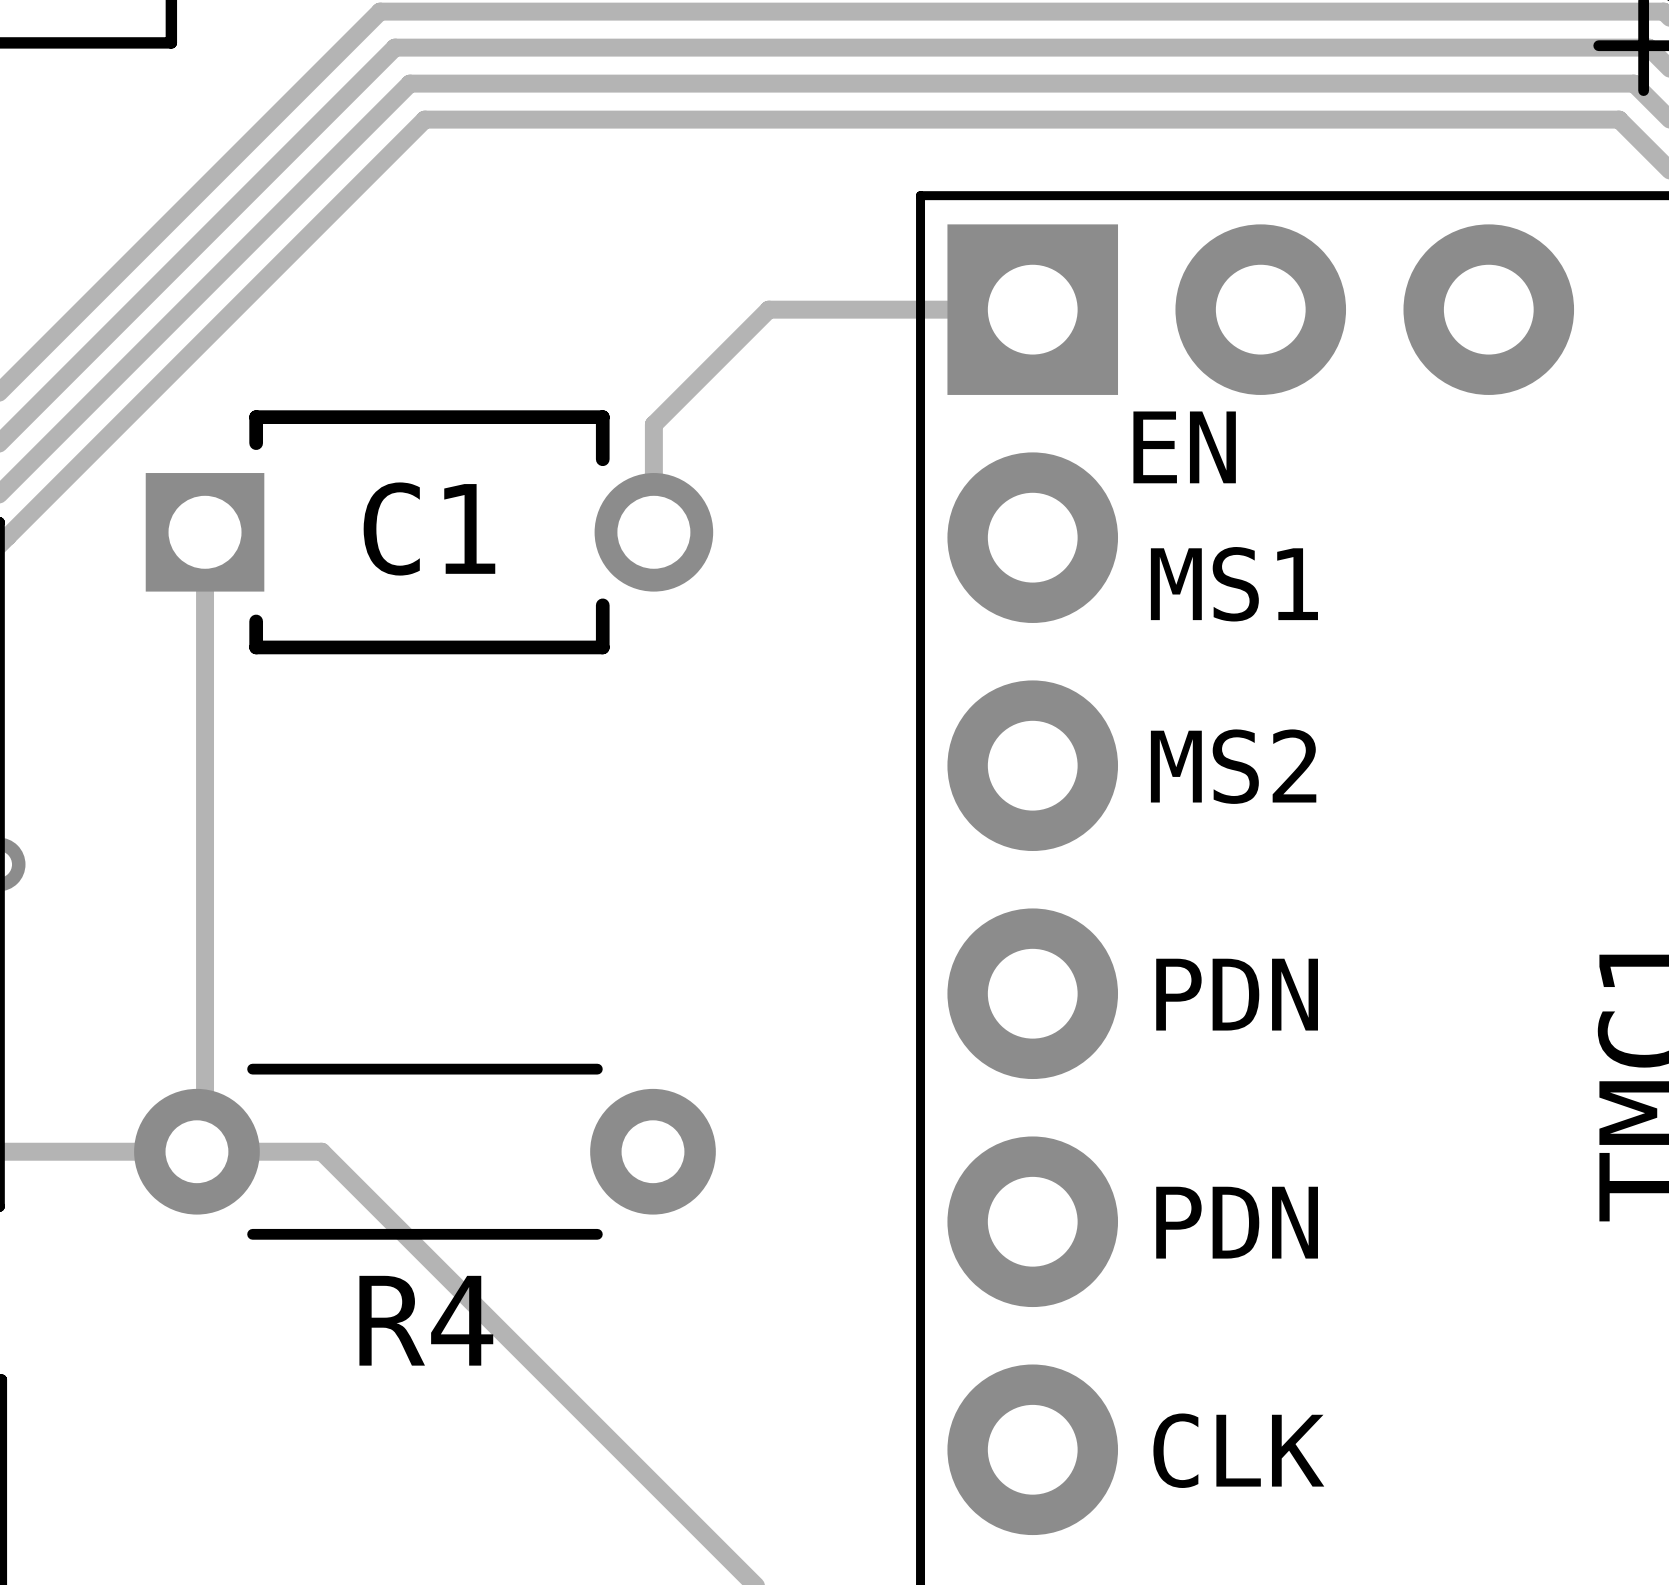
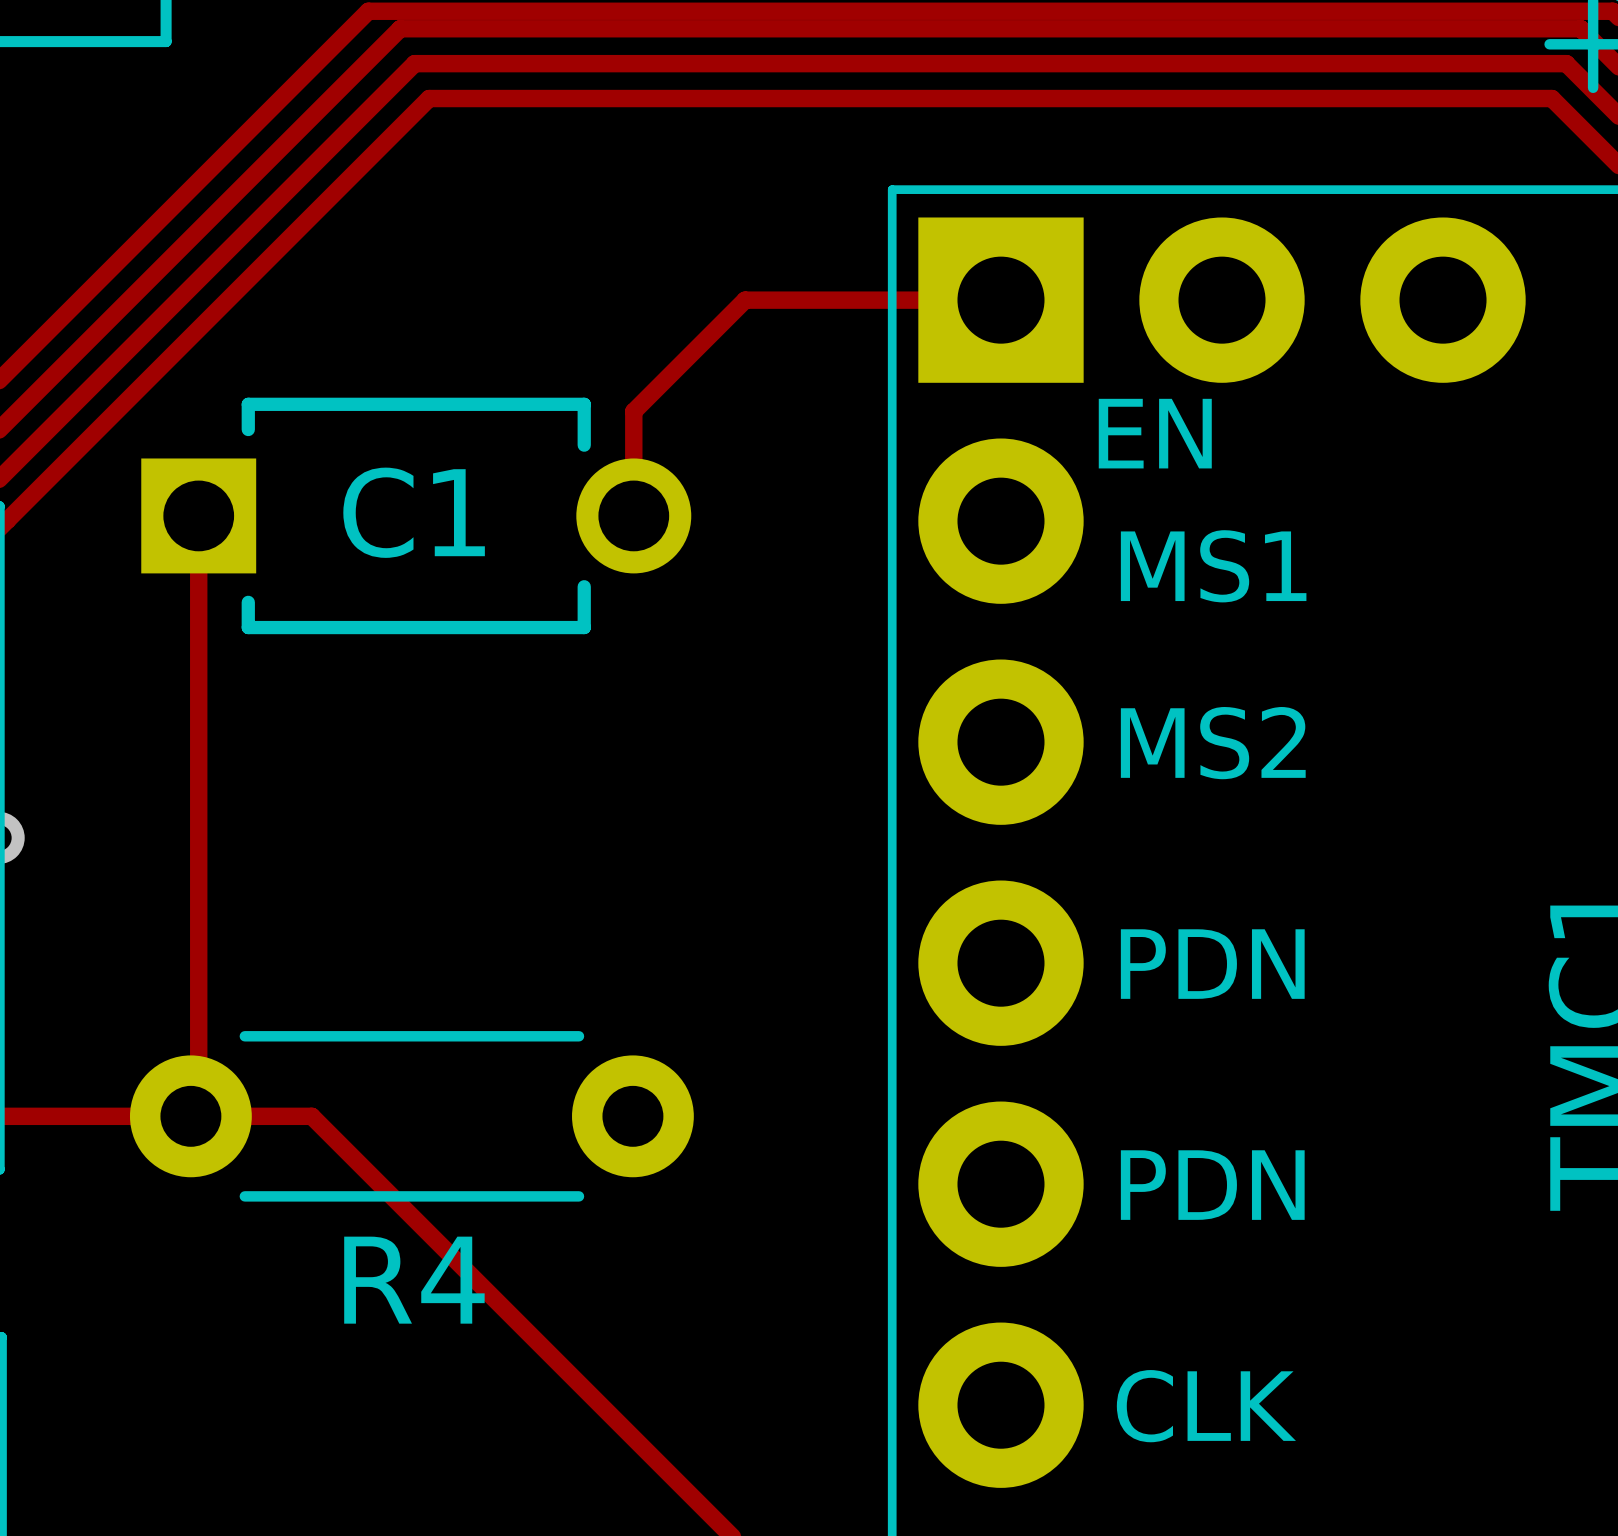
track: (394, 47) (1648, 47) -> (382, 46) (400, 28) (1580, 28) (1598, 46)
track: (409, 83) (1634, 83) -> (397, 81) (414, 63) (1566, 63) (1583, 81)
track: (424, 119) (1619, 119) -> (411, 115) (429, 98) (1551, 98) (1569, 115)

